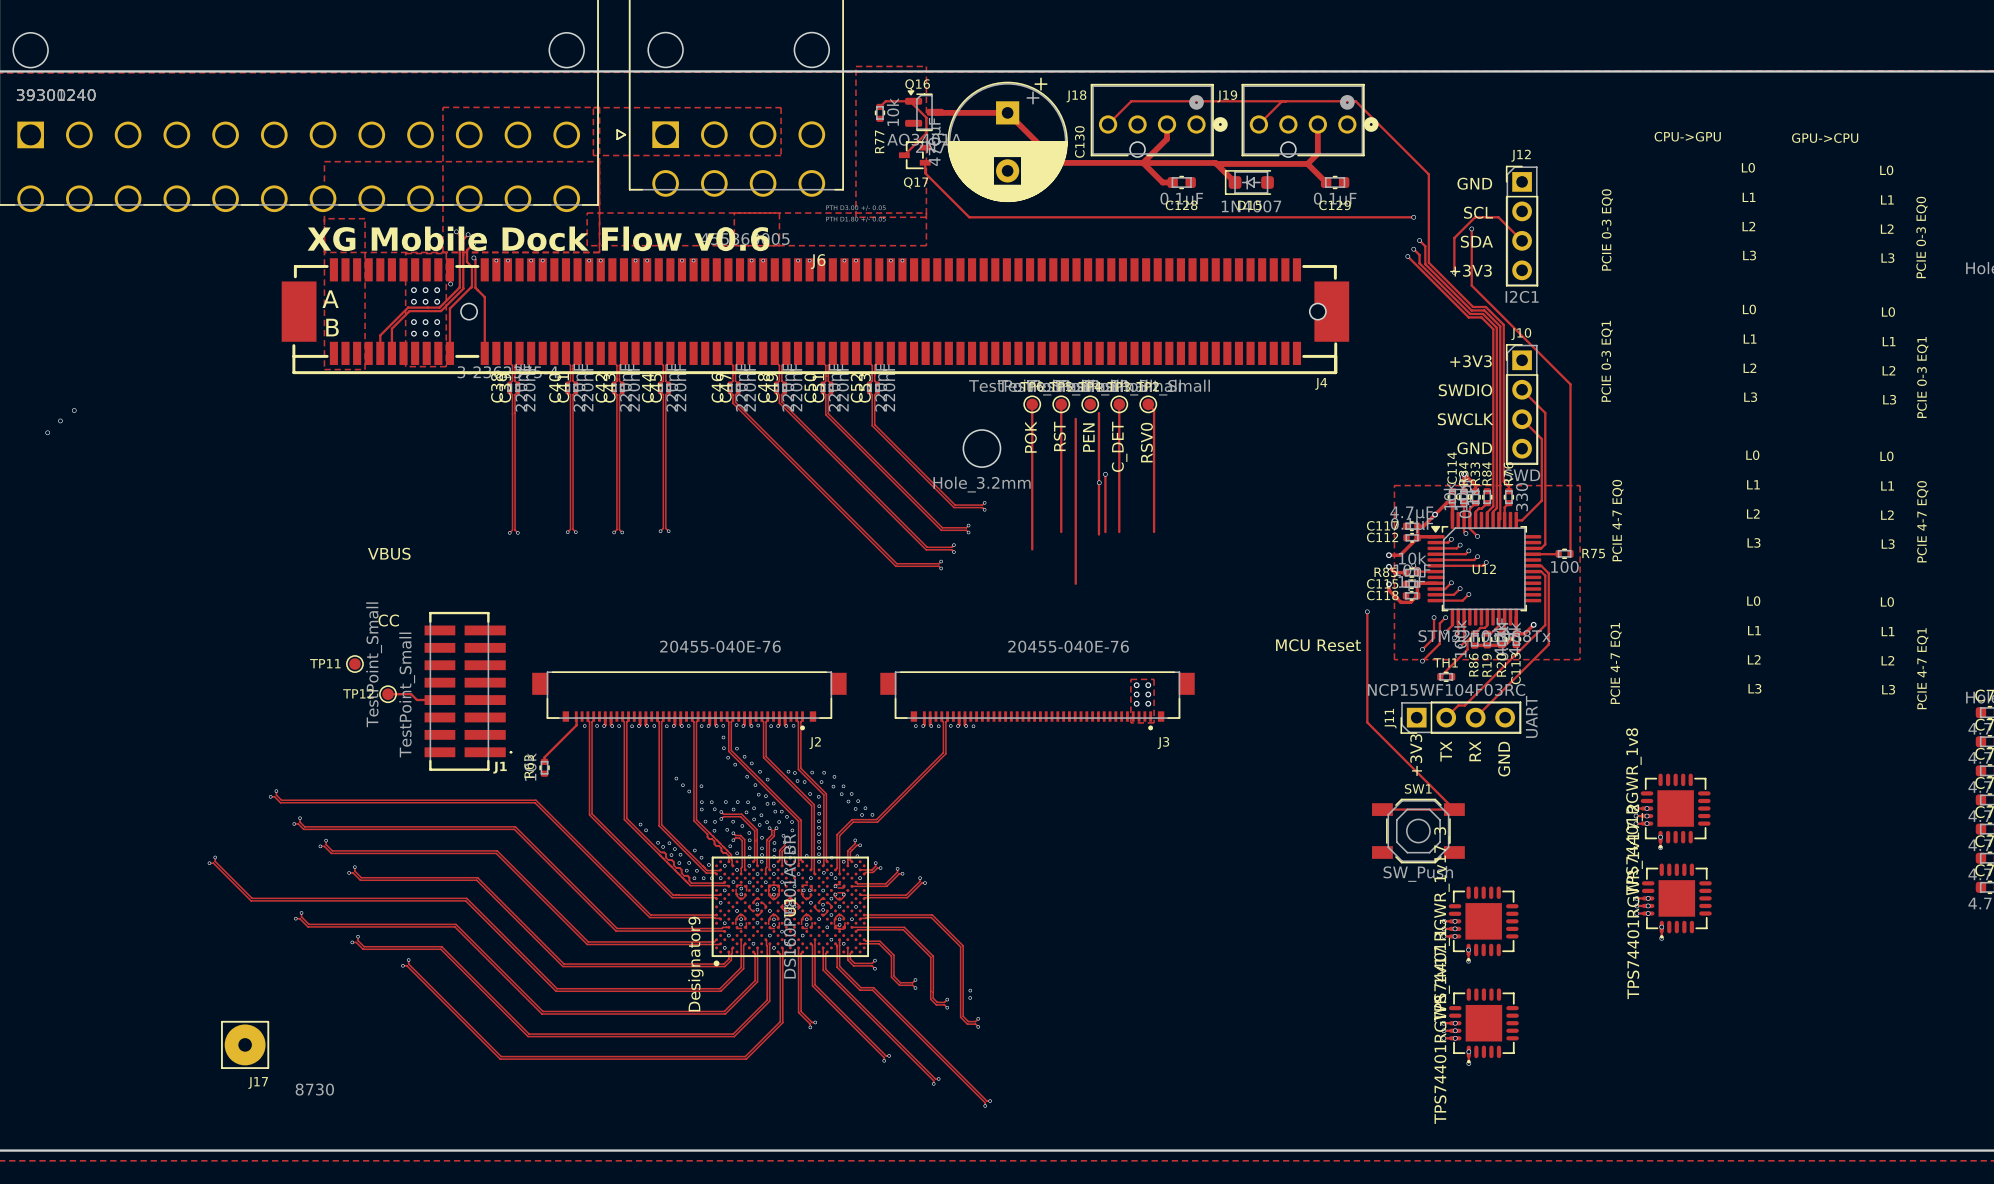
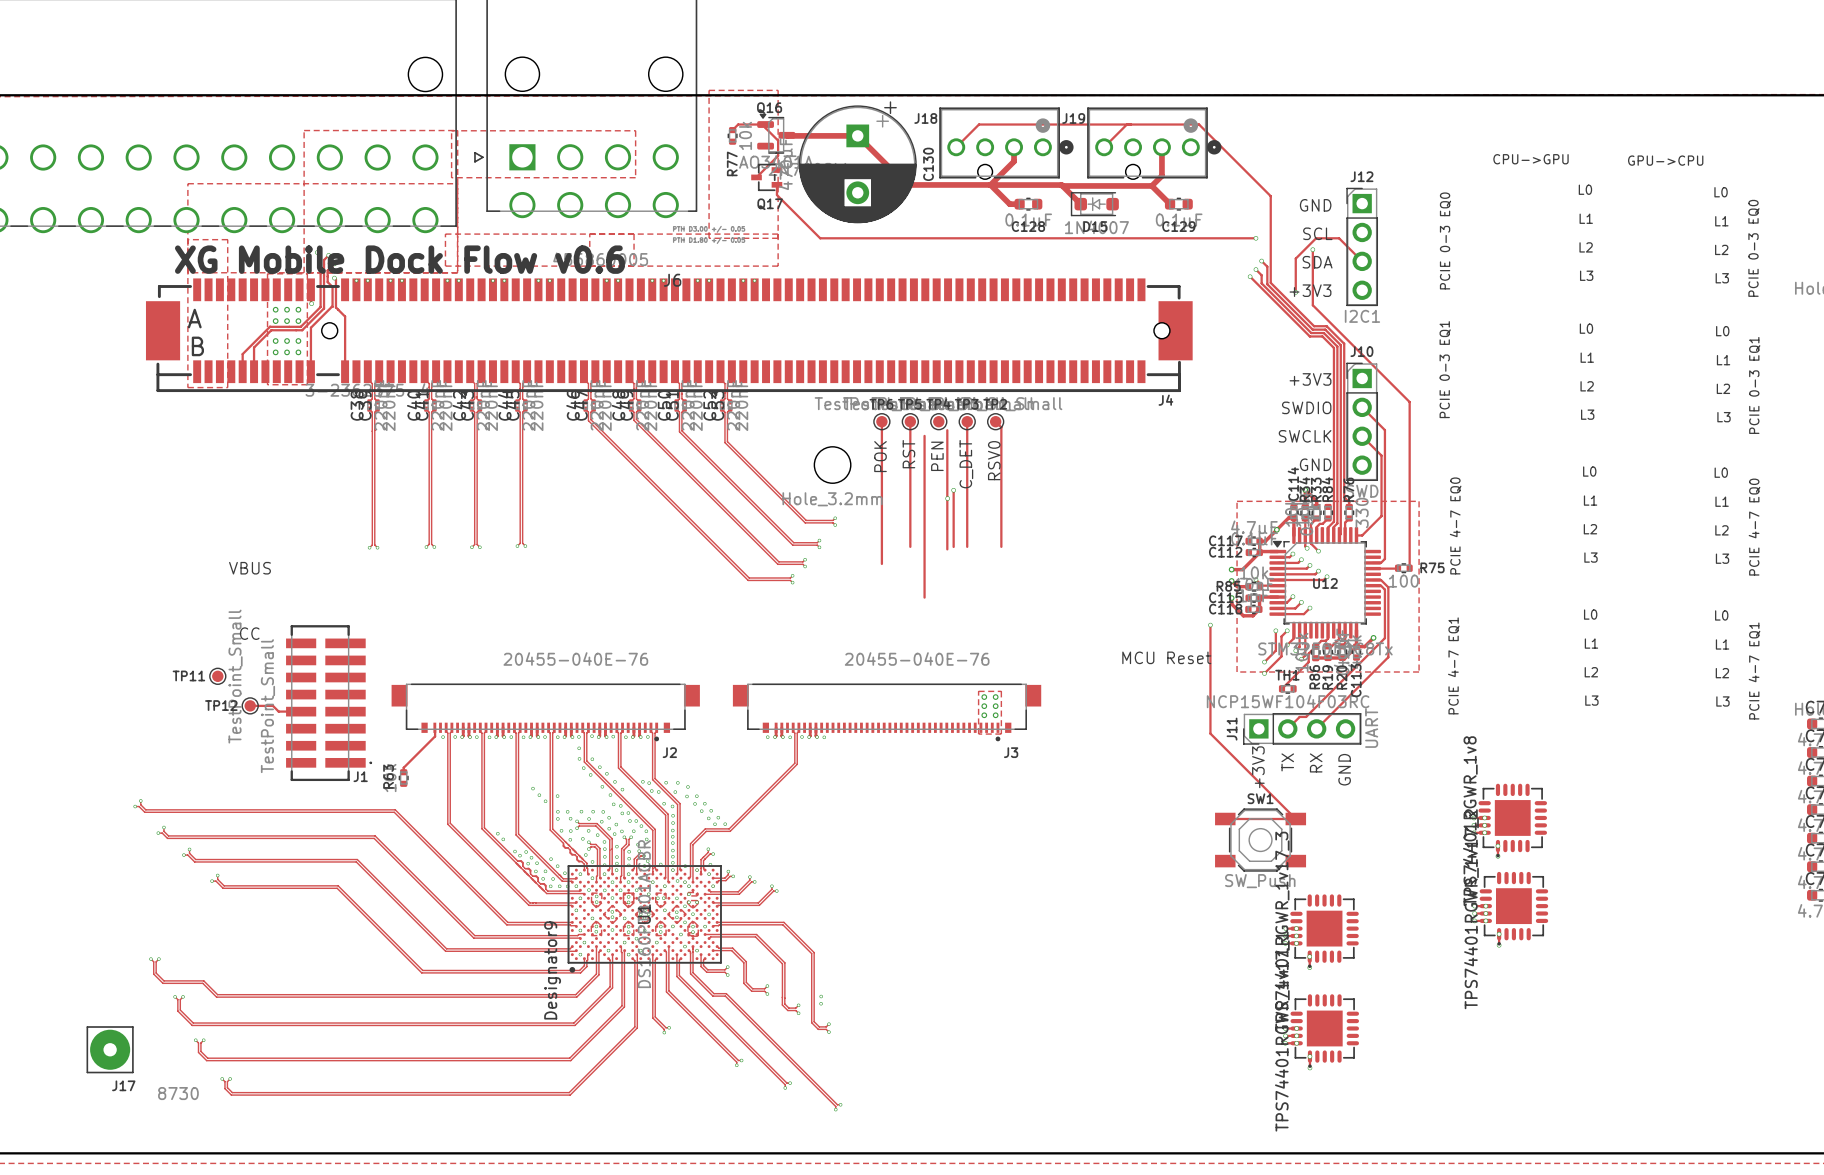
track: (215, 857) (215, 861) (252, 898) (466, 898) (557, 988) -> (158, 959) (156, 961) (156, 973) (163, 980) (203, 980) (217, 994) (416, 994)
via: (215, 857) -> none
track: (209, 863) (213, 863) (251, 900) (465, 900) (556, 991) -> (150, 959) (153, 961) (153, 974) (162, 983) (202, 983) (216, 997) (414, 997)
via: (209, 863) -> none
track: (301, 912) (301, 916) (309, 924) (455, 924) (543, 1011) (724, 1011) -> (183, 996) (180, 999) (180, 1010) (193, 1023) (573, 1023) (580, 1016)
via: (301, 912) -> none
track: (295, 918) (299, 918) (308, 926) (454, 926) (541, 1013) (725, 1013) -> (175, 996) (177, 999) (177, 1011) (192, 1025) (574, 1025) (581, 1019)
via: (295, 918) -> none
track: (358, 936) (358, 940) (364, 946) (441, 946) (529, 1034) (733, 1034) -> (203, 1040) (200, 1042) (200, 1051) (207, 1058) (569, 1058) (588, 1039)
via: (358, 936) -> none
track: (352, 942) (356, 942) (363, 949) (440, 949) (528, 1036) (734, 1036) -> (195, 1040) (198, 1042) (198, 1052) (206, 1060) (570, 1060) (589, 1041)
via: (352, 942) -> none
via: none -> (150, 959)
via: none -> (158, 959)
track: (408, 960) (408, 964) (501, 1056) (745, 1056) -> (230, 1078) (227, 1081) (227, 1087) (232, 1092) (569, 1092) (600, 1061)
via: (408, 960) -> none
track: (402, 965) (406, 965) (500, 1059) (746, 1059) -> (222, 1078) (224, 1081) (224, 1088) (231, 1095) (570, 1095) (601, 1063)
via: (402, 965) -> none
via: none -> (175, 996)
via: none -> (183, 996)
via: none -> (195, 1040)
via: none -> (203, 1040)
via: none -> (222, 1078)
via: none -> (230, 1078)

